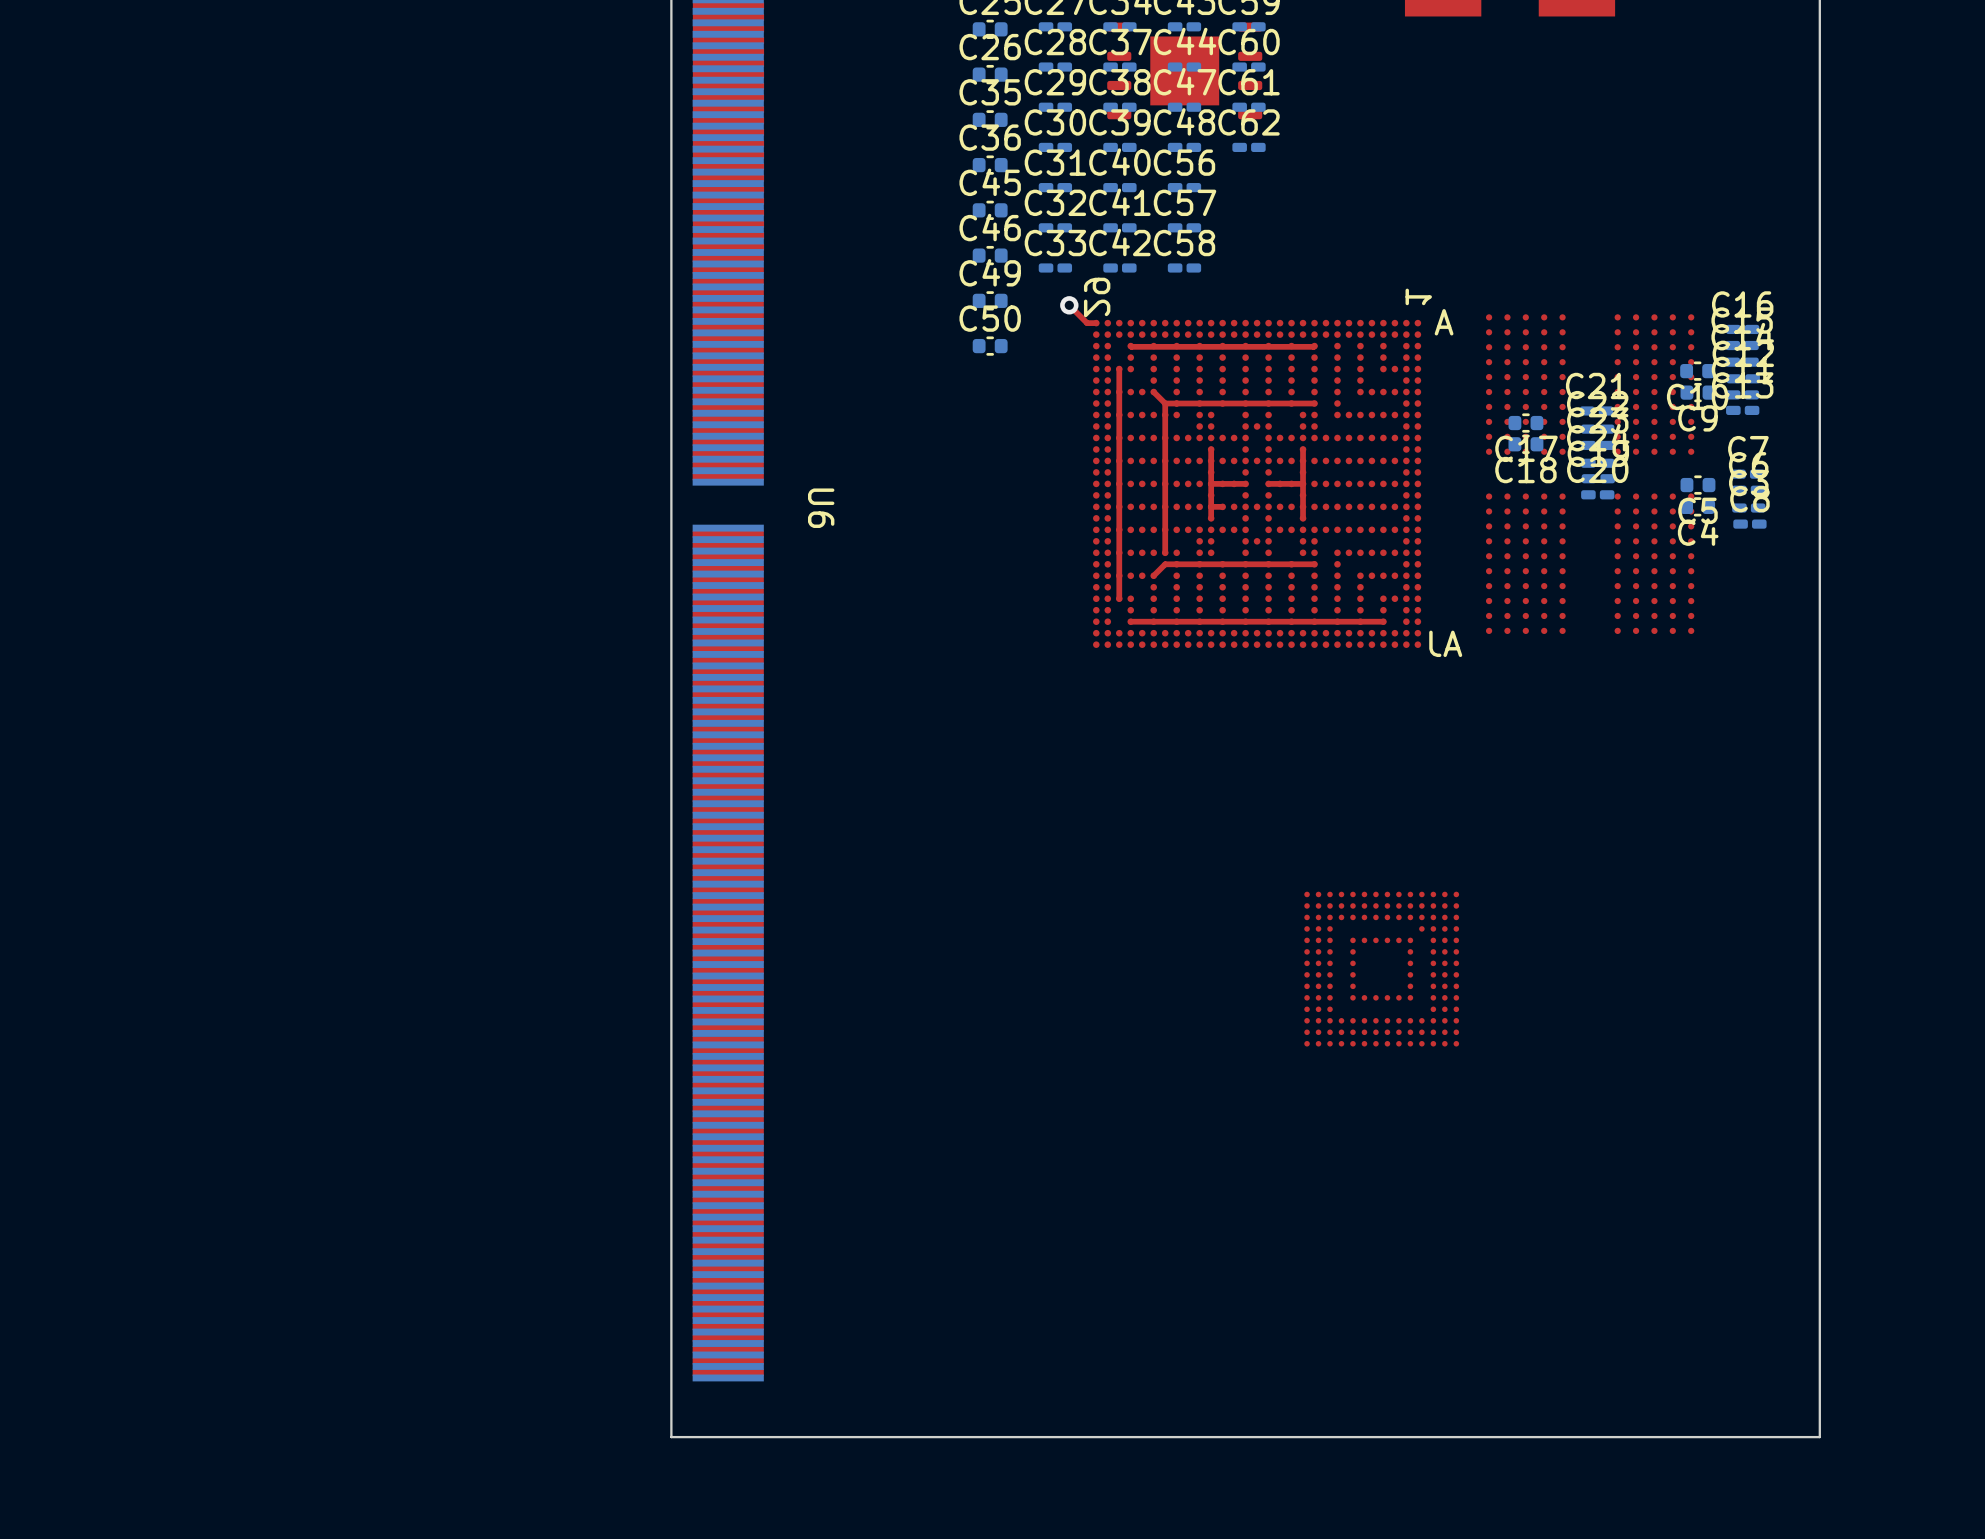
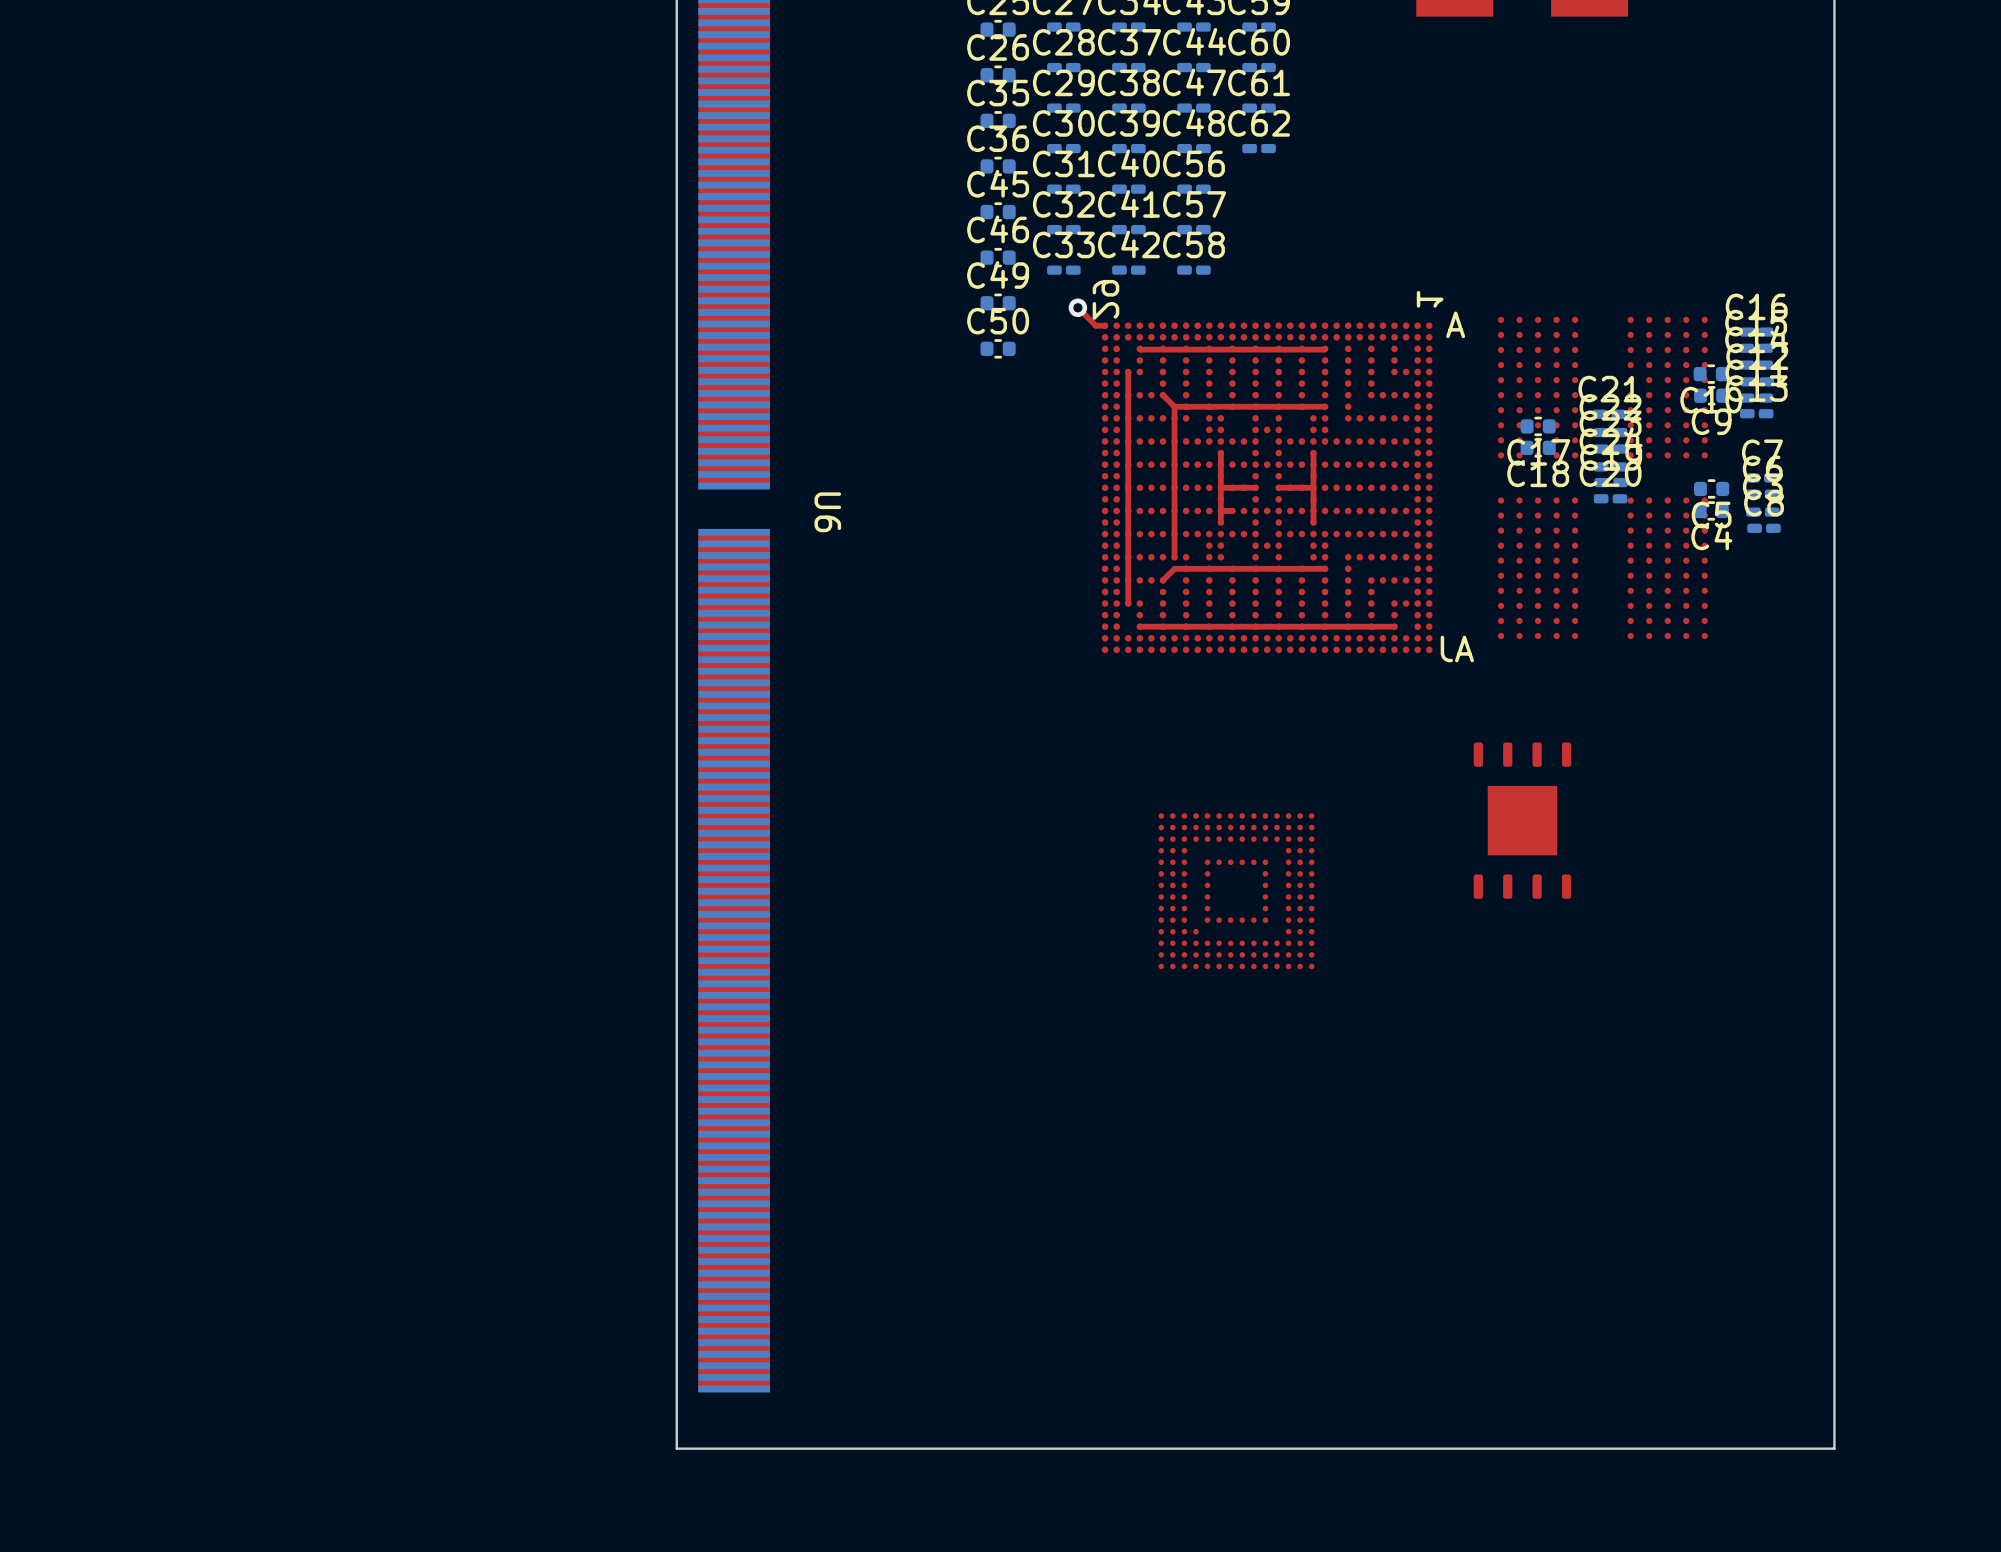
part: (1184, 70) -> none
part: none -> (1522, 820)
part rotation: 0° (1381, 969) -> 180° (1236, 891)
part position: (1381, 969) -> (1236, 891)

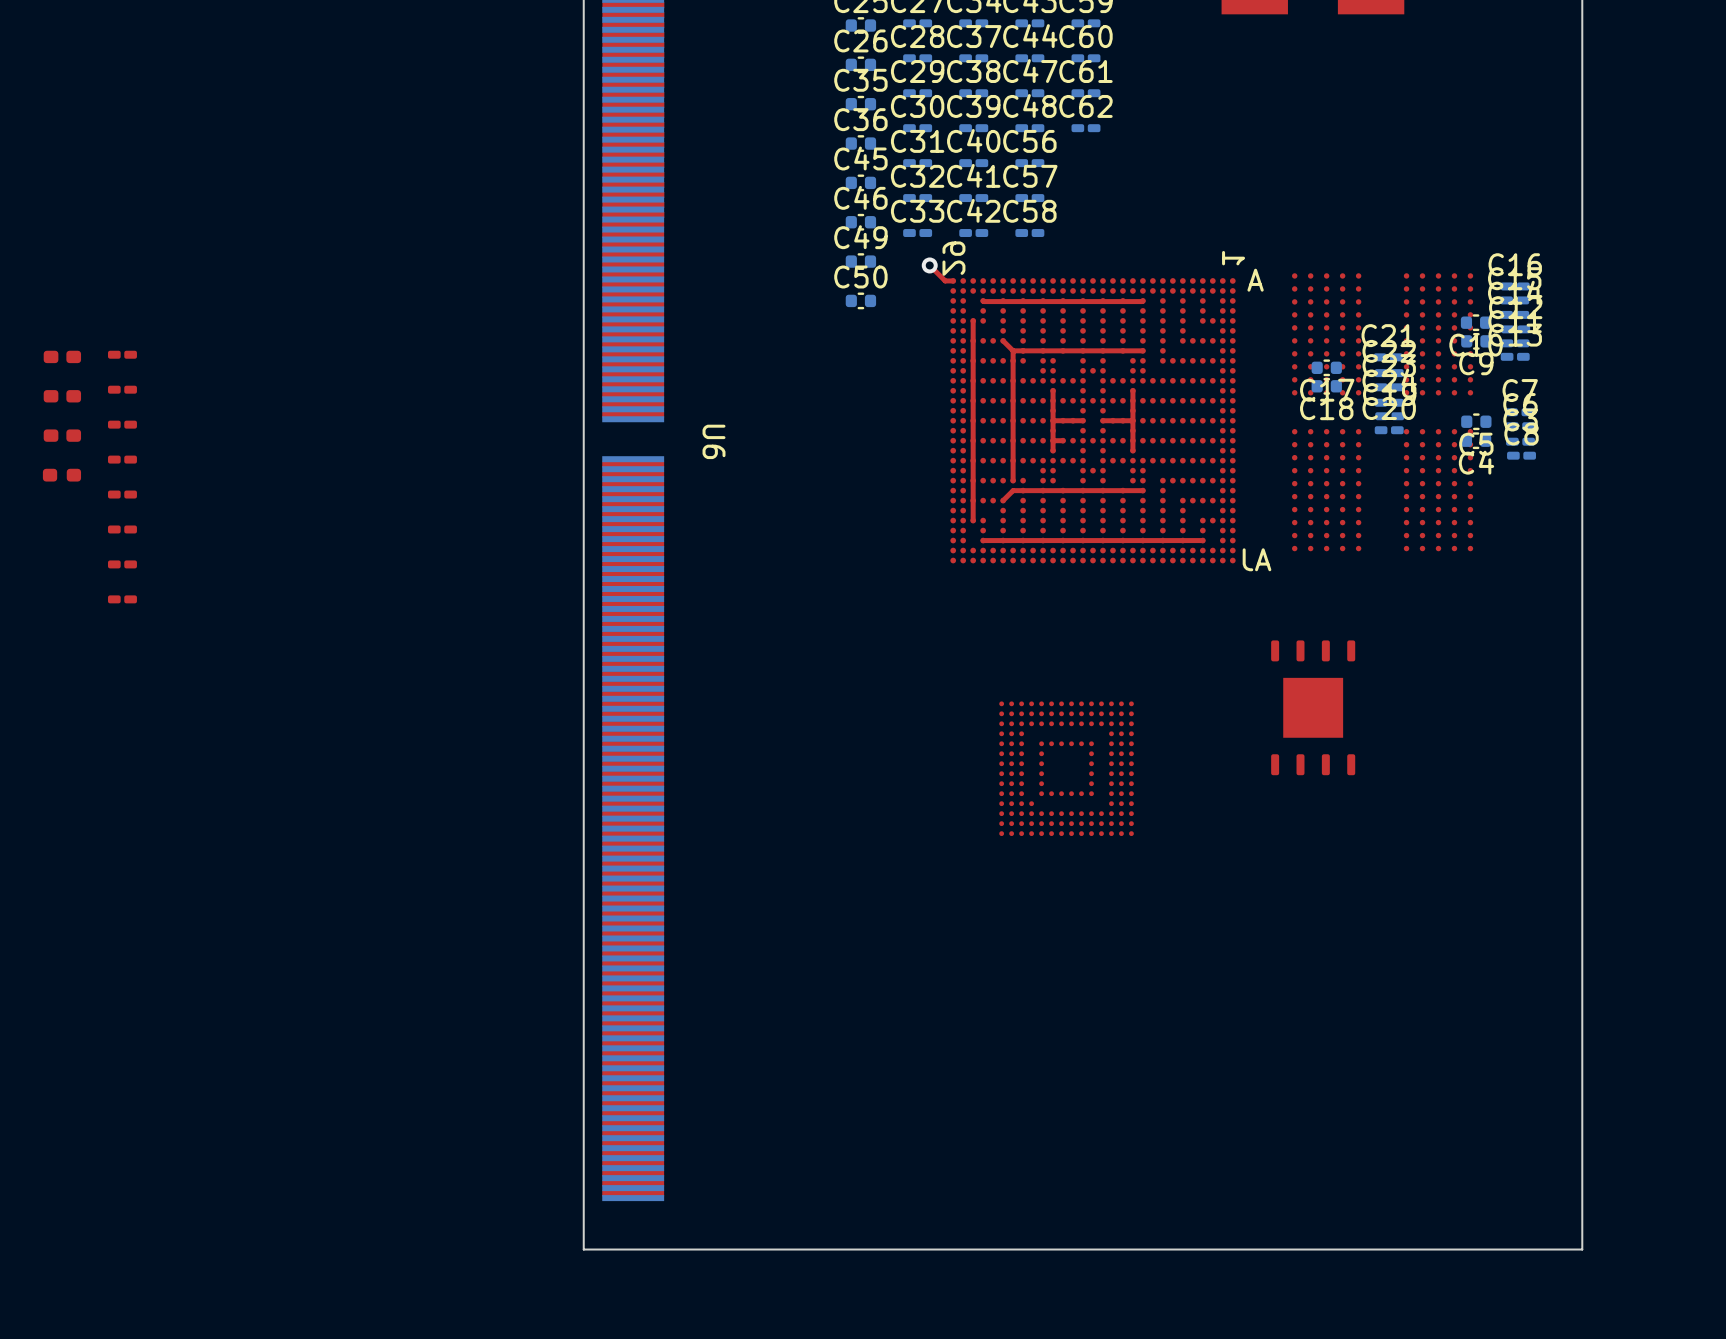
part: none -> (122, 354)
part: none -> (62, 356)
part: none -> (122, 389)
part: none -> (62, 396)
part: none -> (122, 424)
part: none -> (62, 435)
part: none -> (122, 459)
part: none -> (61, 475)
part: none -> (122, 494)
part: none -> (122, 529)
part: none -> (122, 564)
part: none -> (122, 599)

